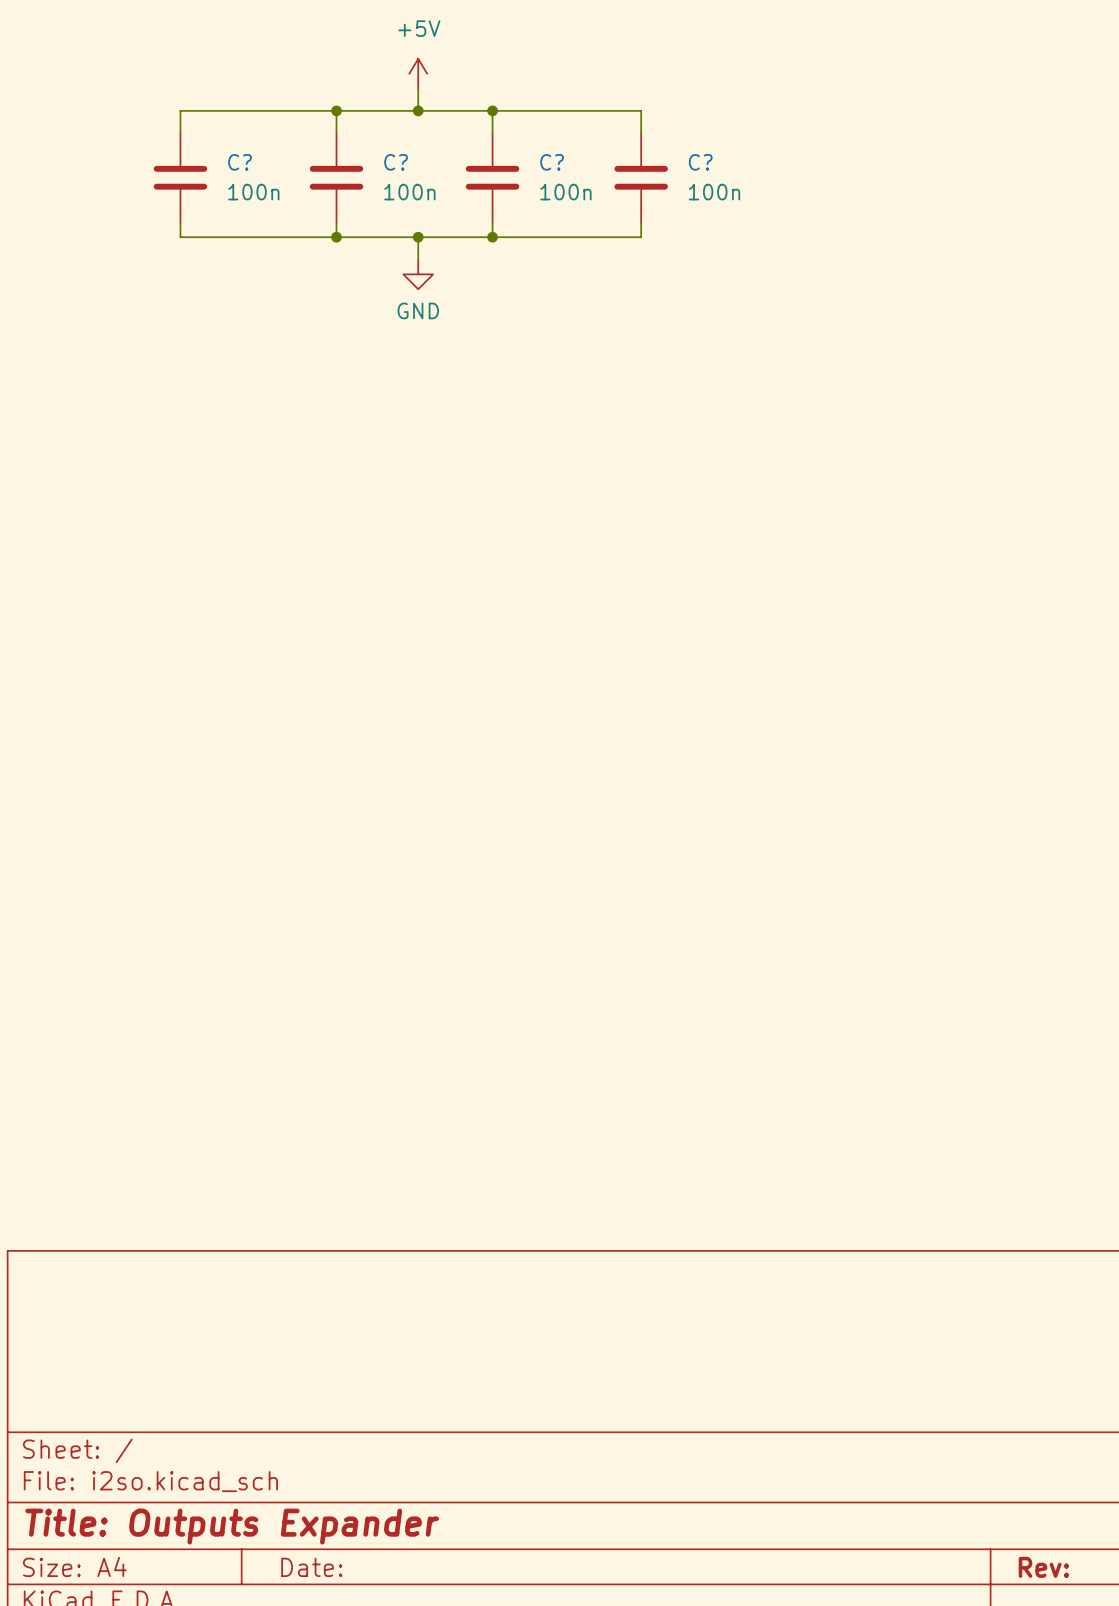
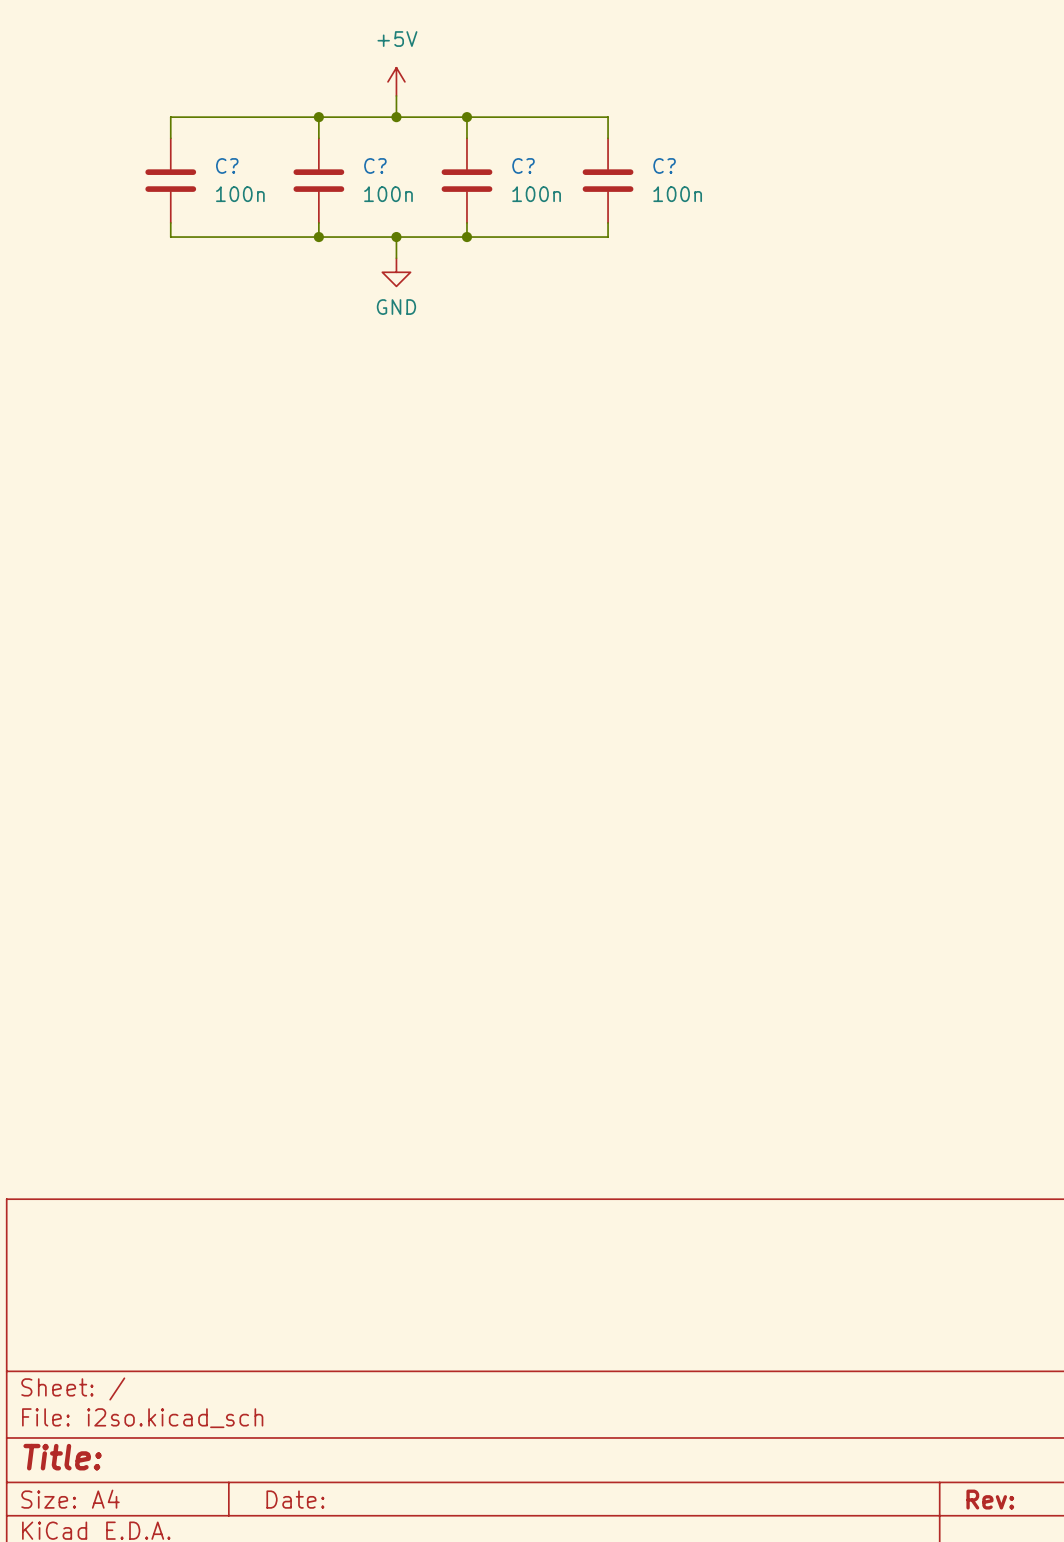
title block: Title: Outputs Expander (232, 1526) -> Title: (62, 1457)

